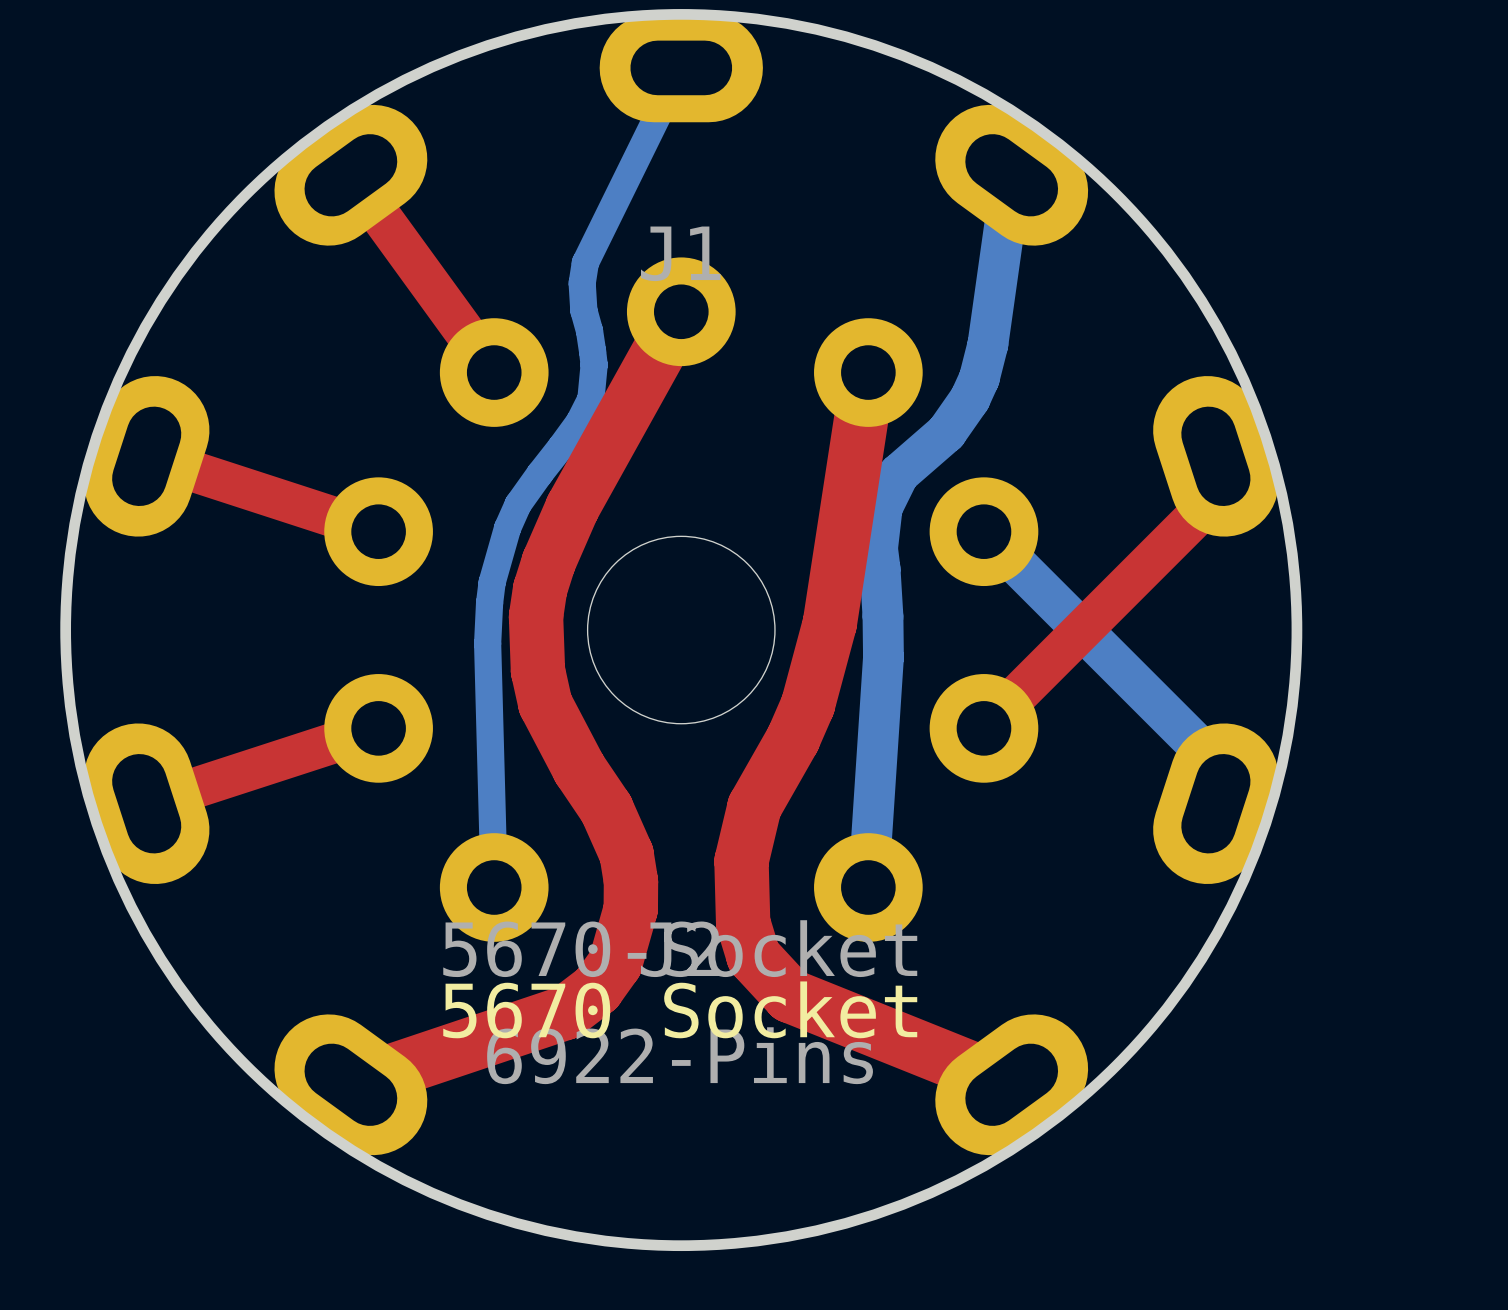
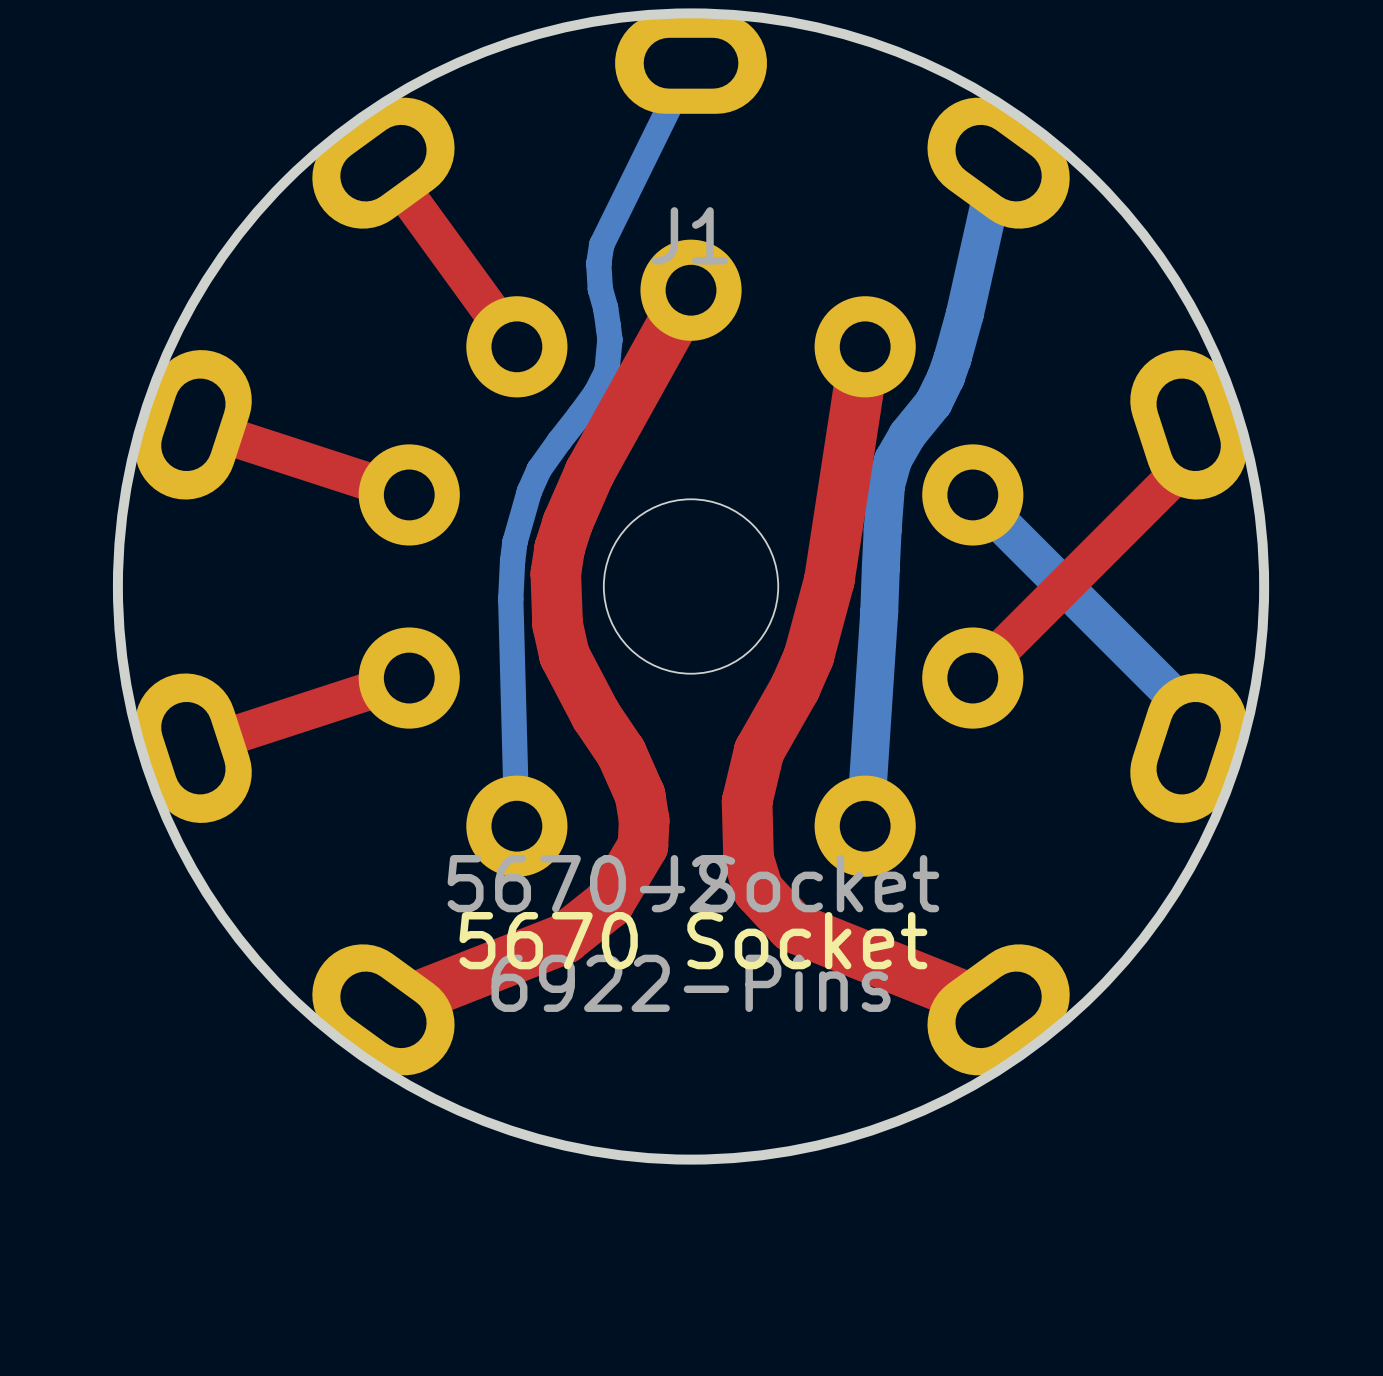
bottom track: (1011, 175) (987, 344) (979, 378) (969, 398) (946, 432) (898, 473) (882, 507) (877, 548) (882, 616) (883, 657) -> (998, 163) (964, 314) (952, 358) (933, 402) (907, 434) (893, 459) (886, 485) (879, 611)
top track: (630, 881) (630, 908) (615, 963) (596, 988) (565, 1012) (350, 1084) -> (644, 820) (642, 845) (608, 903) (564, 938) (383, 1009)

